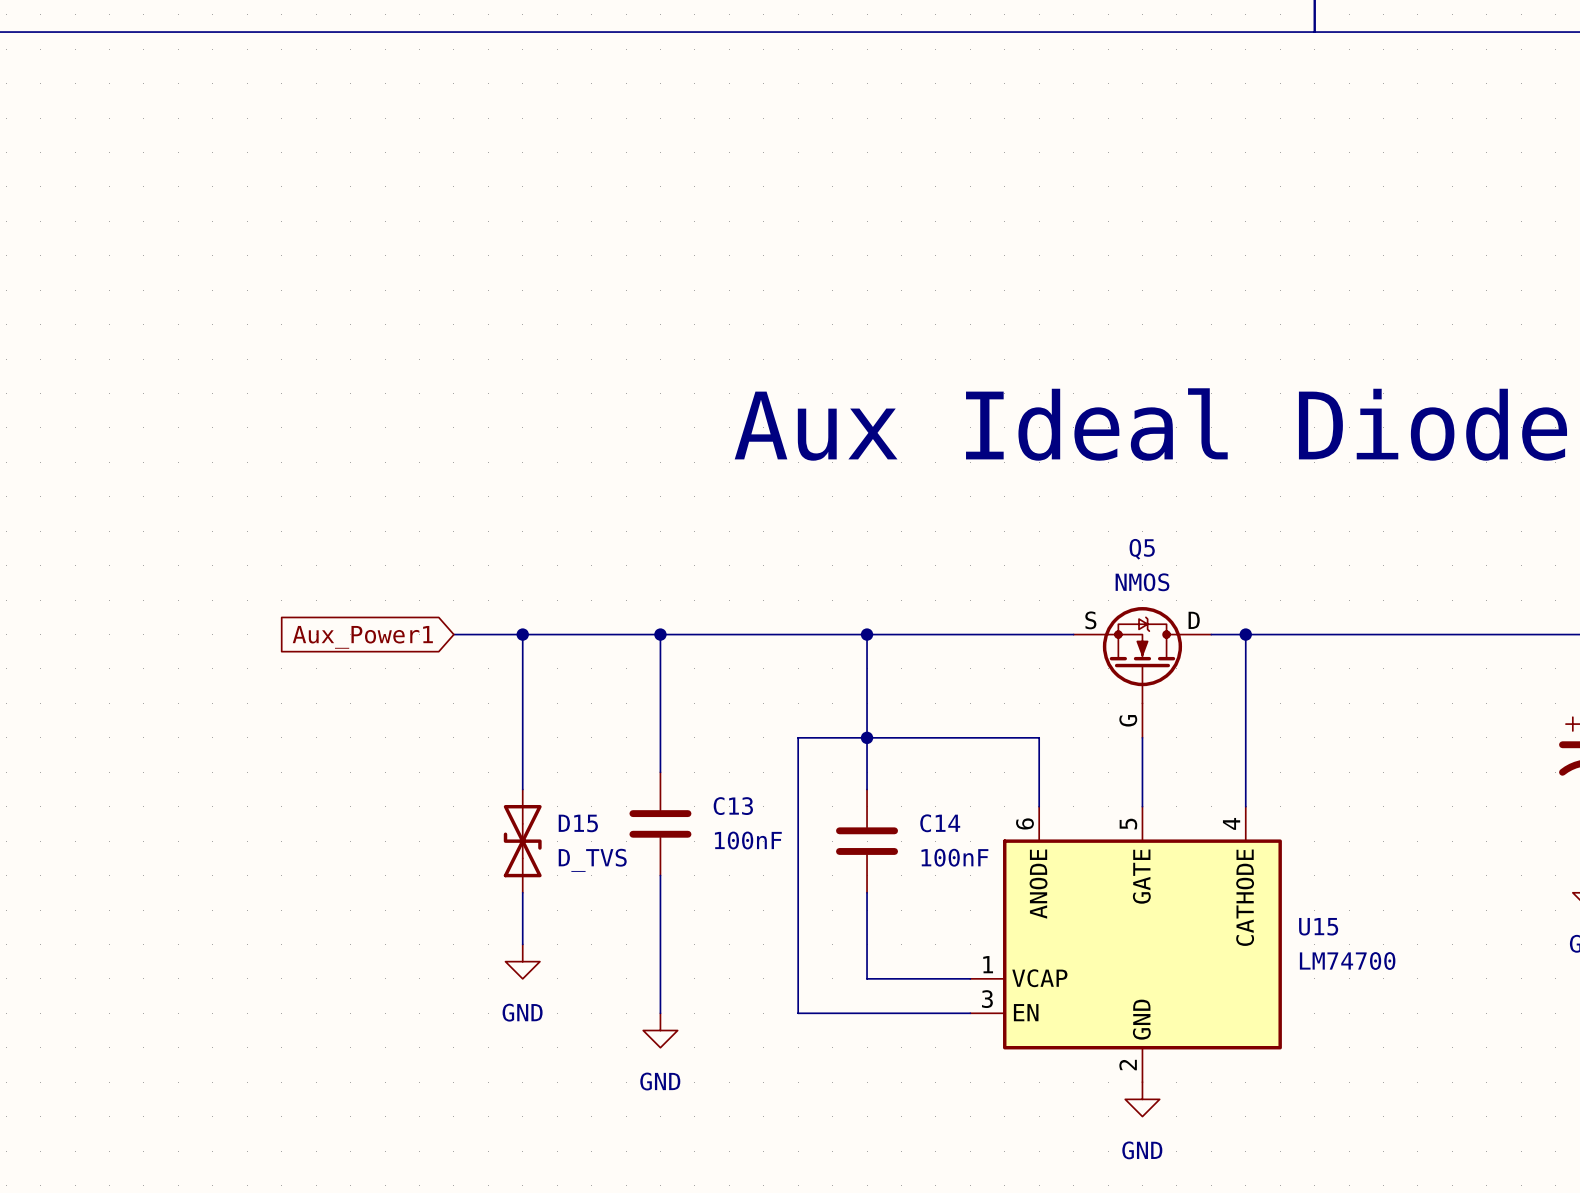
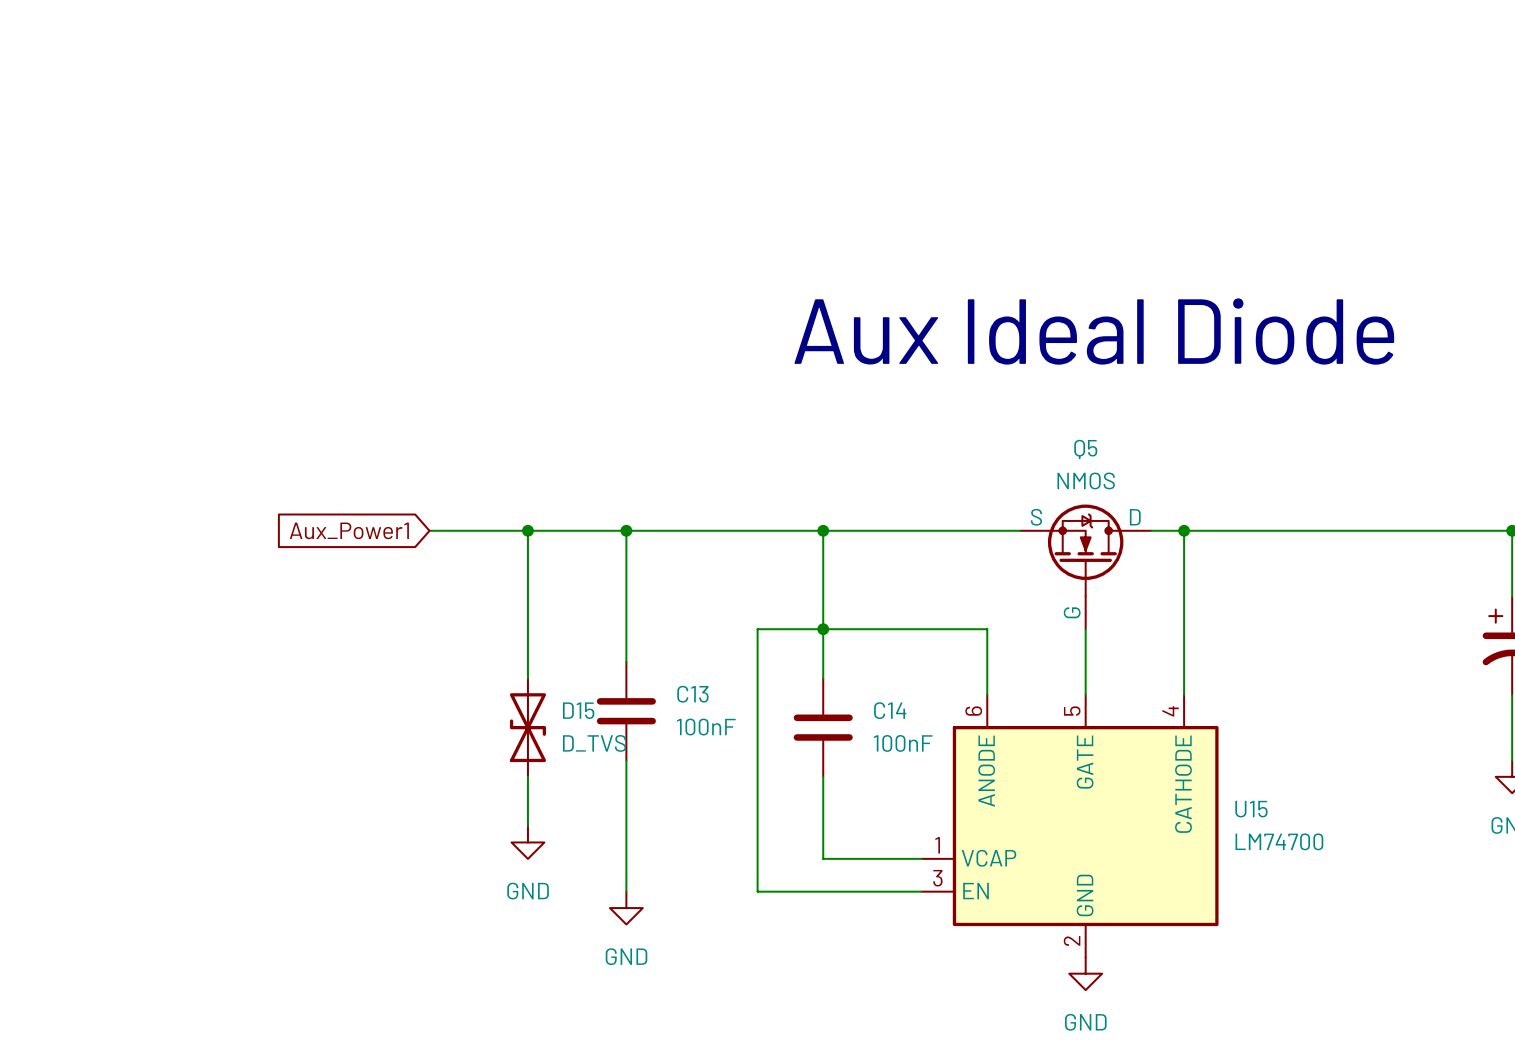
wire: (522, 634) (522, 789) -> (527, 530) (527, 678)
junction position: (522, 634) -> (527, 530)
D15 position: (522, 841) -> (527, 727)
wire: (522, 892) (522, 944) -> (527, 776) (527, 826)
power symbol position: GND (522, 961) -> GND (527, 842)

